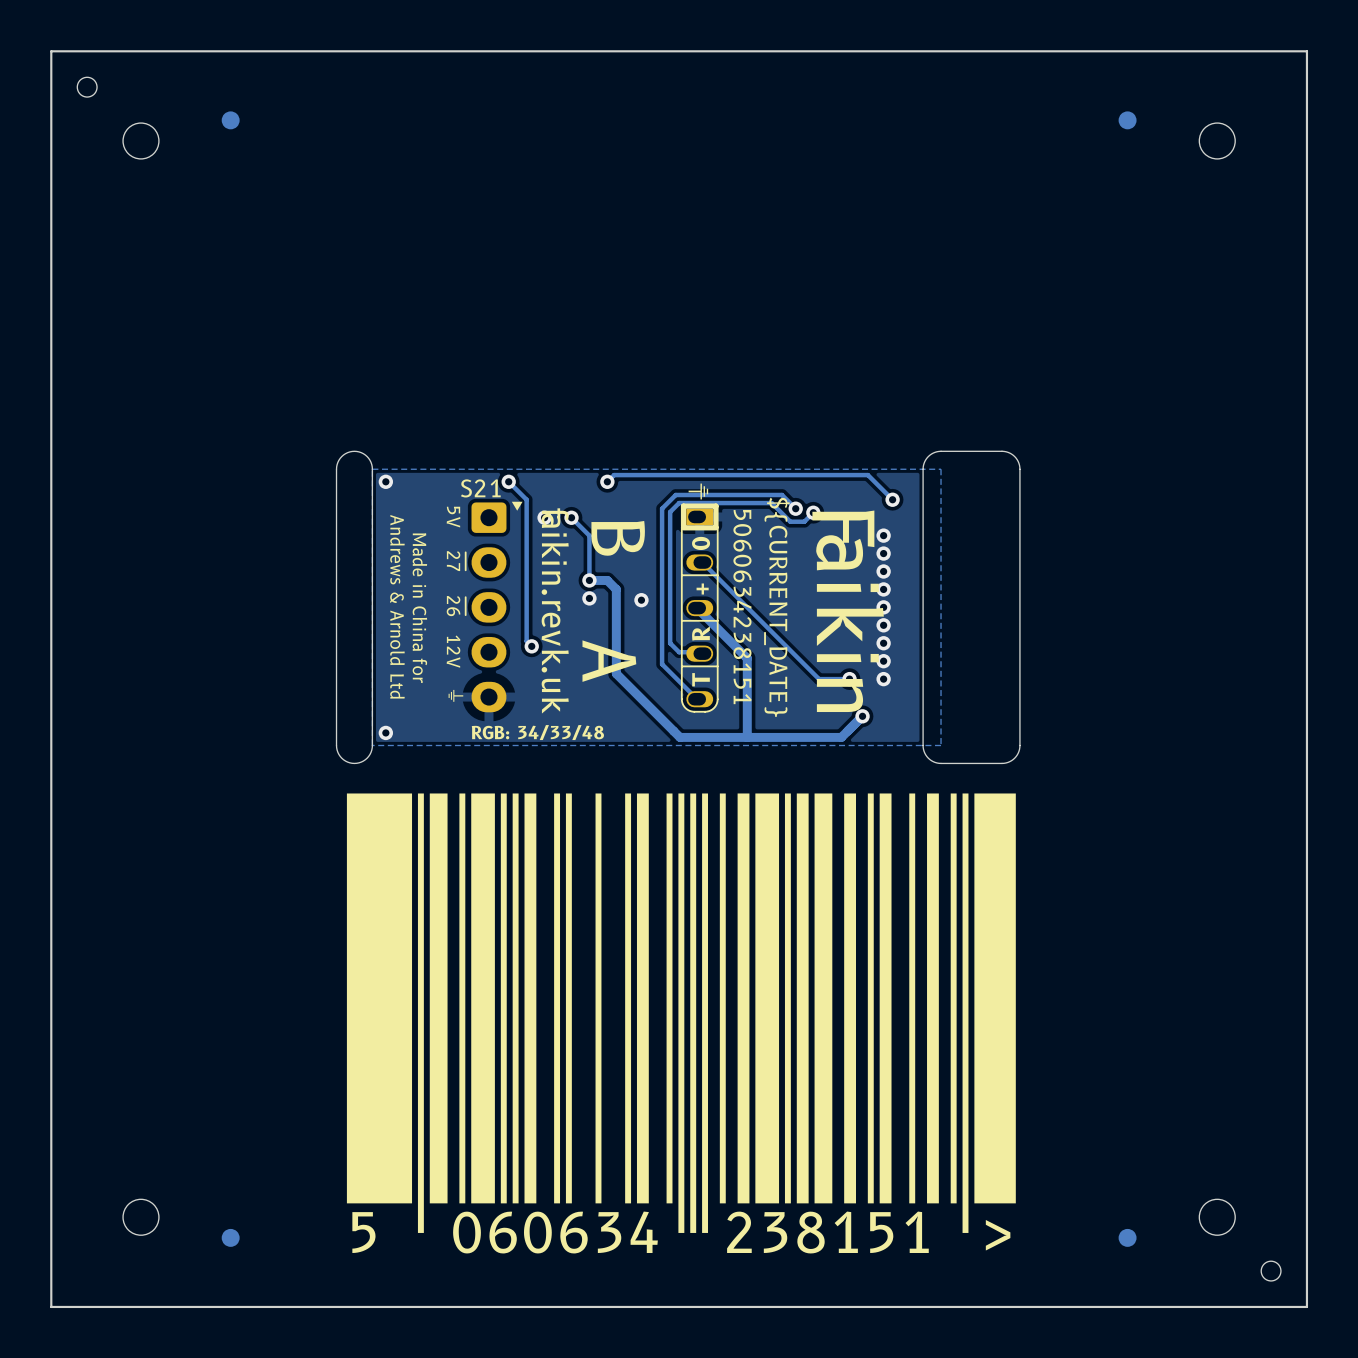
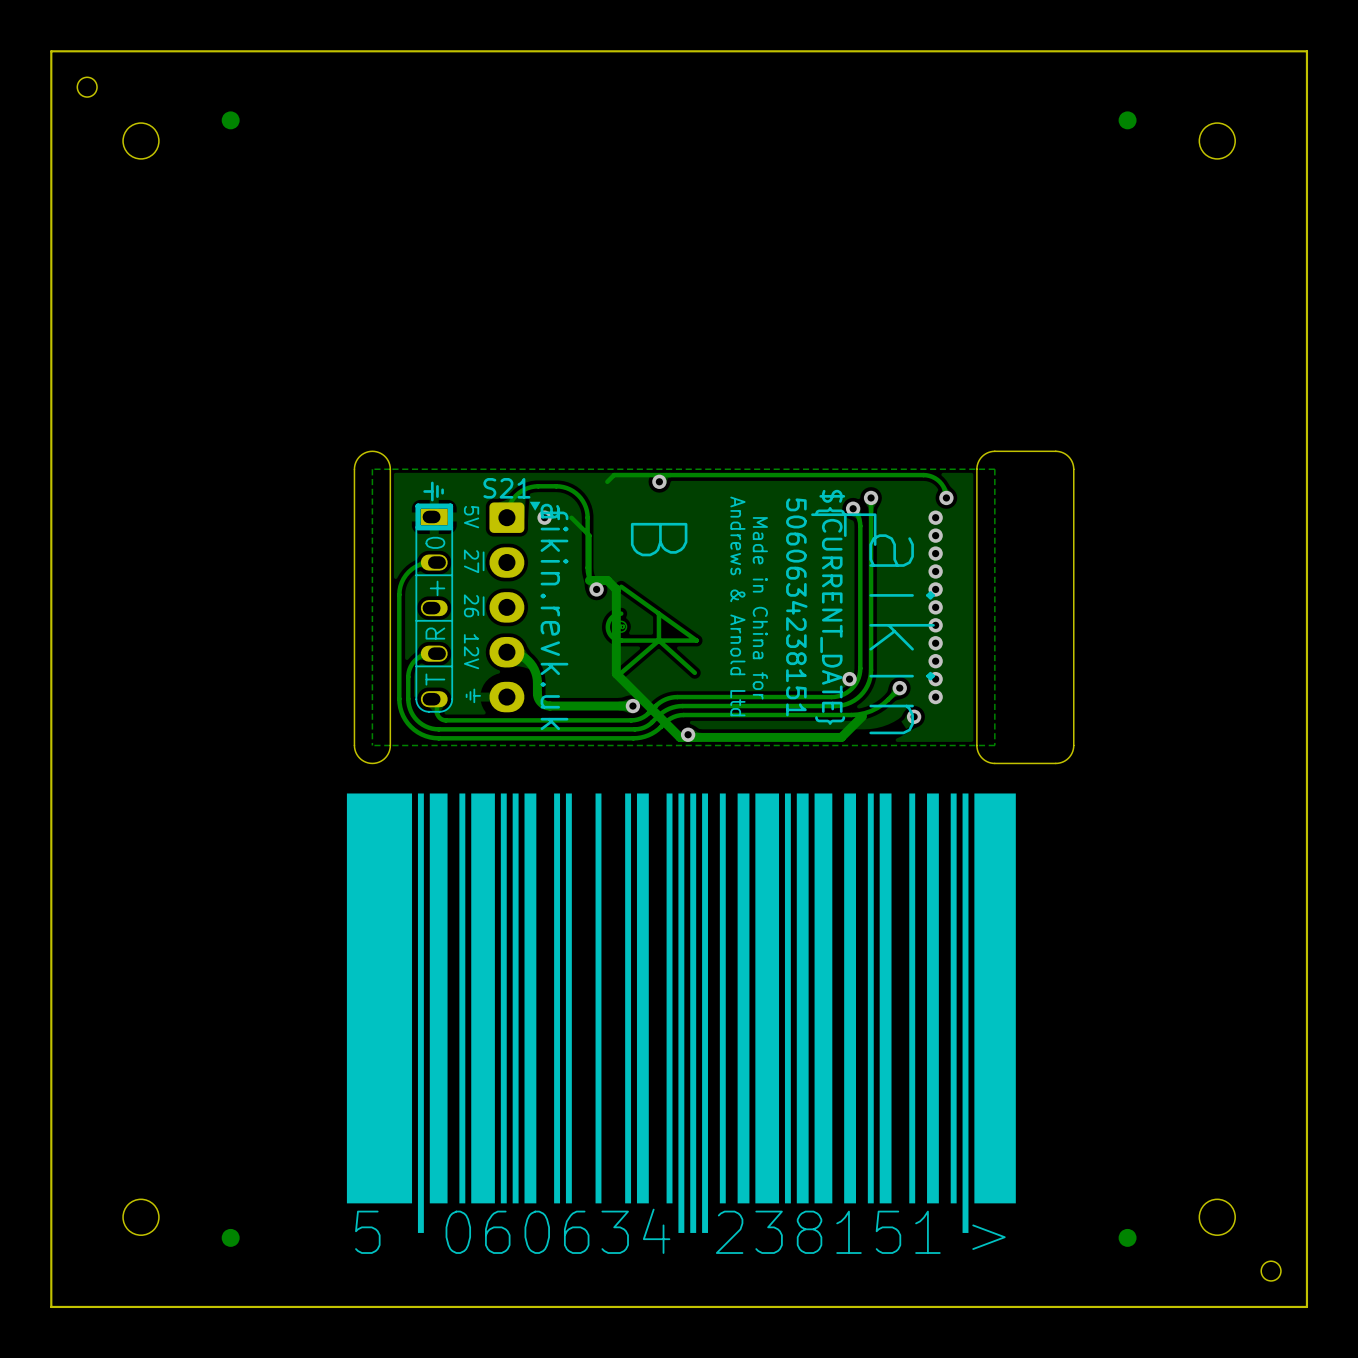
board edge: (994, 451) (937, 451) (926, 458) (923, 469) (923, 749) (928, 758) (937, 762) (994, 763) -> (994, 451) (982, 456) (976, 469) (977, 747) (983, 759) (994, 763)
board edge: (1002, 451) (1014, 456) (1019, 469) (1019, 747) (1013, 759) (1002, 763) -> (1002, 451) (1059, 451) (1069, 458) (1073, 469) (1073, 749) (1068, 758) (1059, 762) (1002, 763)
board edge: (372, 469) (372, 745) (367, 758) (354, 763) (341, 758) (336, 745) (336, 469) (341, 456) (354, 451) (367, 456) (372, 469) -> none
board edge: none -> (390, 469) (390, 747) (384, 758) (378, 762) (370, 763) (358, 757) (354, 745) (354, 467) (360, 455) (372, 451) (384, 455) (388, 460) (390, 469)
zone outline: (941, 469) (941, 745) -> (941, 469) (994, 469) (994, 745) (941, 745)
track: (867, 475) (892, 499) -> (867, 475) (929, 475) (941, 484) (946, 497)
via: (385, 481) -> none
track: (508, 481) (526, 499) (526, 641) (531, 646) -> none
via: (508, 481) -> none
via: (607, 481) -> none
via: none -> (659, 481)
text position: S21 (480, 488) -> S21 (506, 488)
track: none -> (871, 497) (870, 674) (863, 692) (847, 704) (835, 706) (679, 706) (663, 711) (647, 726) (634, 729) (435, 729) (425, 726) (414, 717) (409, 708) (408, 698) (408, 674) (410, 666) (419, 657) (431, 653)
via: none -> (871, 497)
via: none -> (946, 497)
via: (892, 499) -> none
drawing position: (517, 506) -> (535, 506)
track: (795, 508) (782, 494) (675, 494) (662, 508) (662, 664) (697, 699) -> none
via: (795, 508) -> none
track: none -> (853, 508) (858, 516) (860, 526) (860, 668) (855, 683) (844, 694) (831, 697) (674, 697) (660, 702) (643, 717) (631, 720) (444, 720) (437, 714) (436, 699)
via: none -> (853, 508)
track: (813, 512) (804, 521) (790, 521) (771, 503) (679, 503) (670, 512) (670, 643) (679, 652) (701, 652) -> none
via: (813, 512) -> none
text position: 5V (453, 517) -> 5V (471, 517)
track: none -> (506, 517) (511, 500) (518, 493) (527, 488) (559, 486) (575, 493) (582, 500) (586, 510) (587, 571) (589, 579) (596, 589)
via: (571, 517) -> none
via: none -> (935, 517)
via: (883, 535) -> none
via: none -> (935, 535)
text position: B (618, 538) -> B (659, 539)
line: (465, 552) (465, 570) -> (483, 552) (483, 570)
via: (883, 553) -> none
via: none -> (935, 553)
text position: 27 (453, 561) -> 27 (471, 561)
track: none -> (431, 562) (419, 564) (408, 571) (401, 582) (399, 594) (400, 707) (410, 726) (429, 737) (637, 738) (651, 733) (670, 718) (680, 715) (858, 714) (877, 708) (899, 688)
track: (702, 562) (819, 679) (849, 679) -> none
via: (883, 571) -> none
via: none -> (935, 571)
via: (589, 580) -> none
drawing: none -> [605, 584, 699, 676]
via: none -> (596, 589)
via: (883, 589) -> none
via: none -> (935, 589)
line: (465, 597) (465, 615) -> (483, 597) (483, 615)
via: (589, 598) -> none
via: (641, 600) -> none
text position: Andrews & Arnold Ltd (397, 606) -> Andrews & Arnold Ltd (737, 606)
text position: 26 (453, 606) -> 26 (471, 605)
part position: (488, 607) -> (506, 607)
text position: 5060634238151 (742, 607) -> 5060634238151 (796, 607)
text position: ${CURRENT_DATE} (776, 607) -> ${CURRENT_DATE} (830, 607)
via: (883, 607) -> none
via: none -> (935, 607)
text position: Made in China for (419, 608) -> Made in China for (760, 608)
track: (697, 608) (747, 658) (747, 737) -> none
part position: (699, 608) -> (434, 608)
text position: aikin (850, 623) -> aikin (902, 634)
via: (883, 625) -> none
via: none -> (935, 625)
via: (883, 643) -> none
via: none -> (935, 643)
via: (531, 646) -> none
text position: 12V (453, 651) -> 12V (471, 651)
track: none -> (506, 652) (520, 655) (530, 663) (536, 675) (538, 697) (544, 704) (632, 706)
text: A (609, 661) -> none
via: (883, 661) -> none
via: none -> (935, 661)
via: (883, 679) -> none
via: none -> (935, 679)
via: none -> (899, 688)
text position: ⏚ (455, 695) -> ⏚ (473, 695)
via: none -> (935, 697)
via: none -> (632, 706)
via: (862, 716) -> none
via: none -> (914, 716)
via: (385, 732) -> none
text: RGB: 34/33/48 (537, 732) -> none
via: none -> (688, 734)

